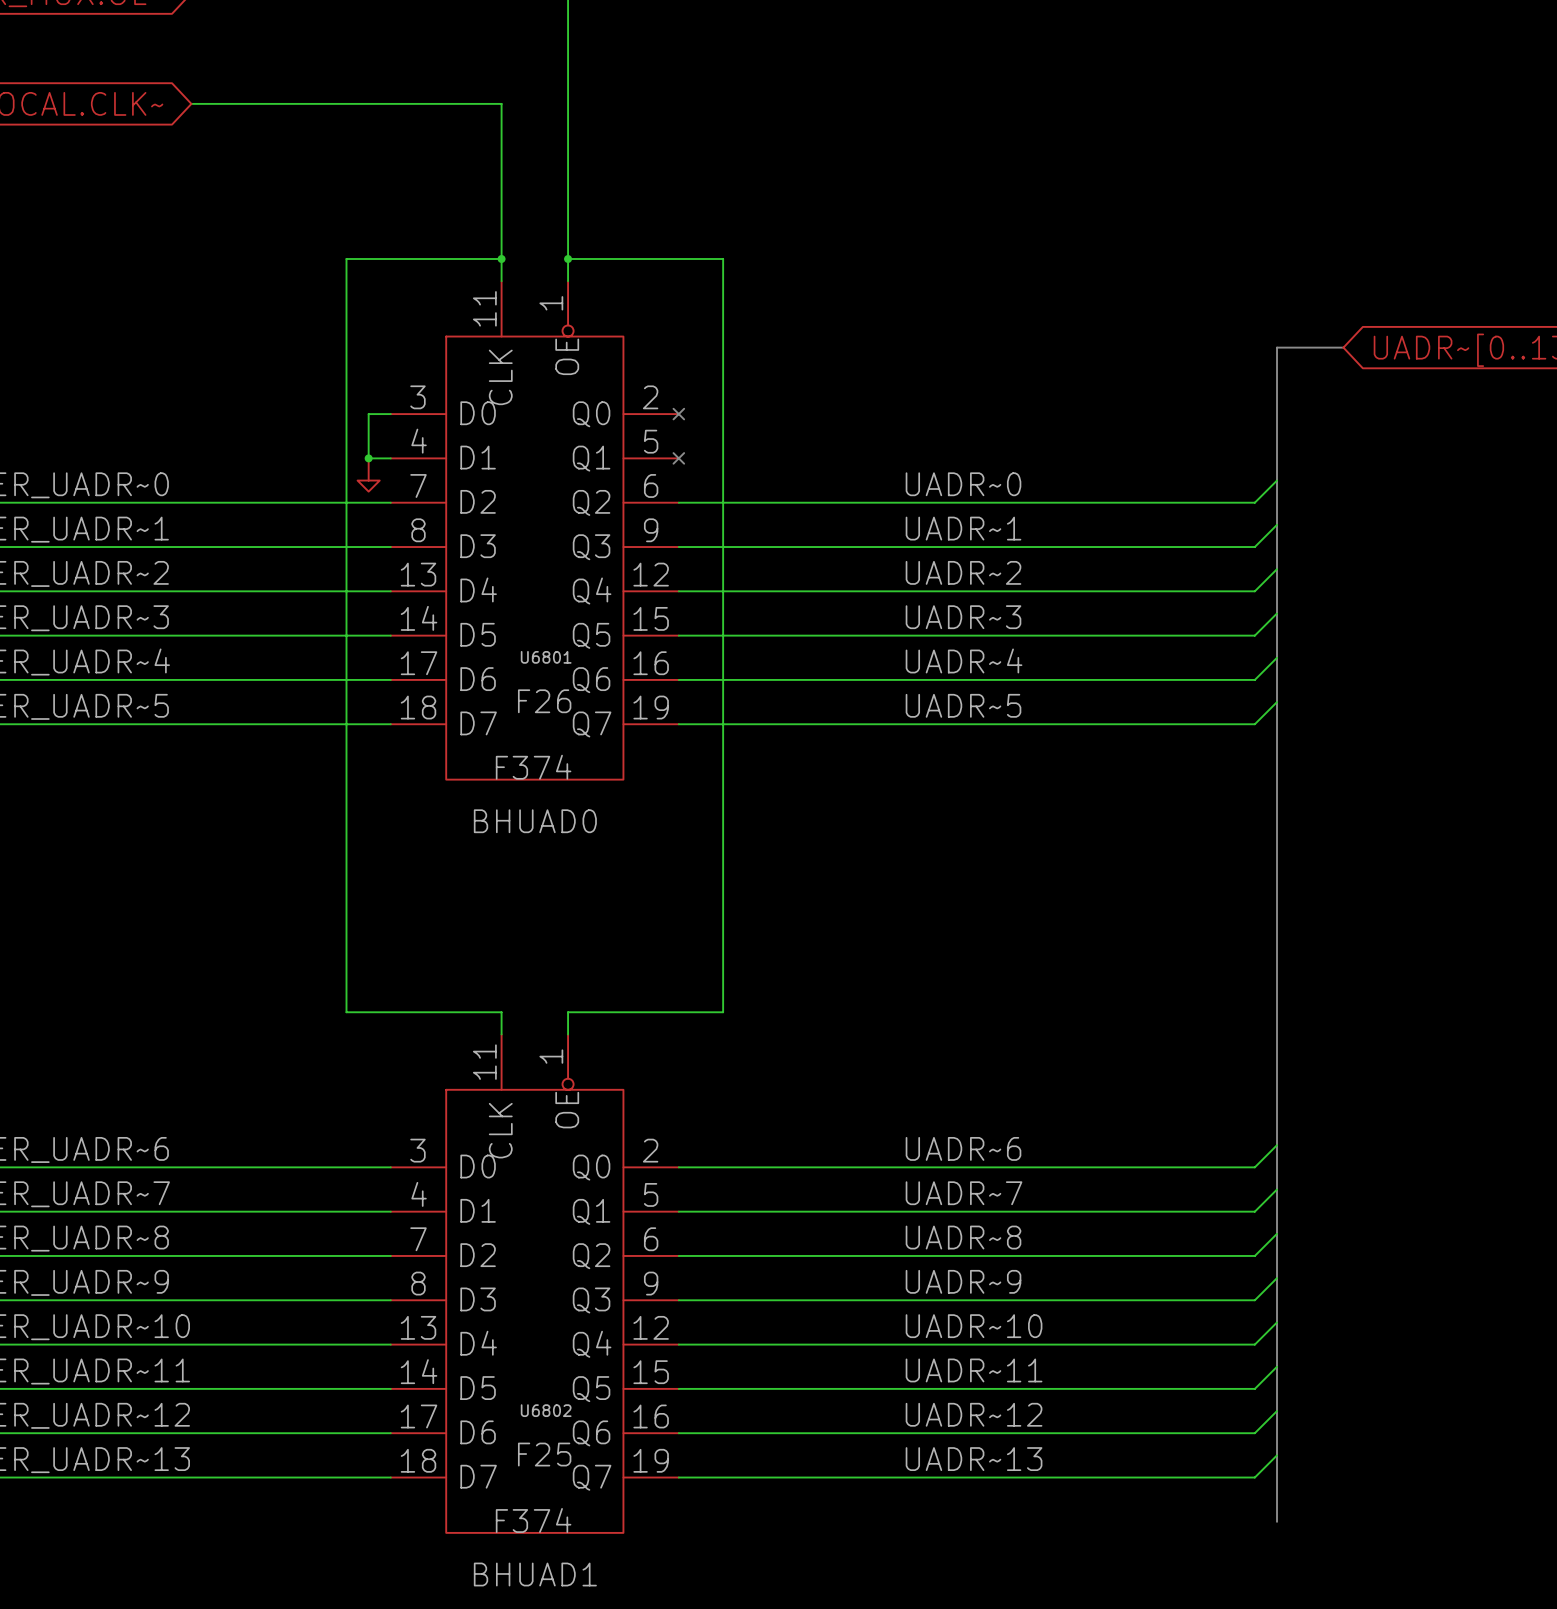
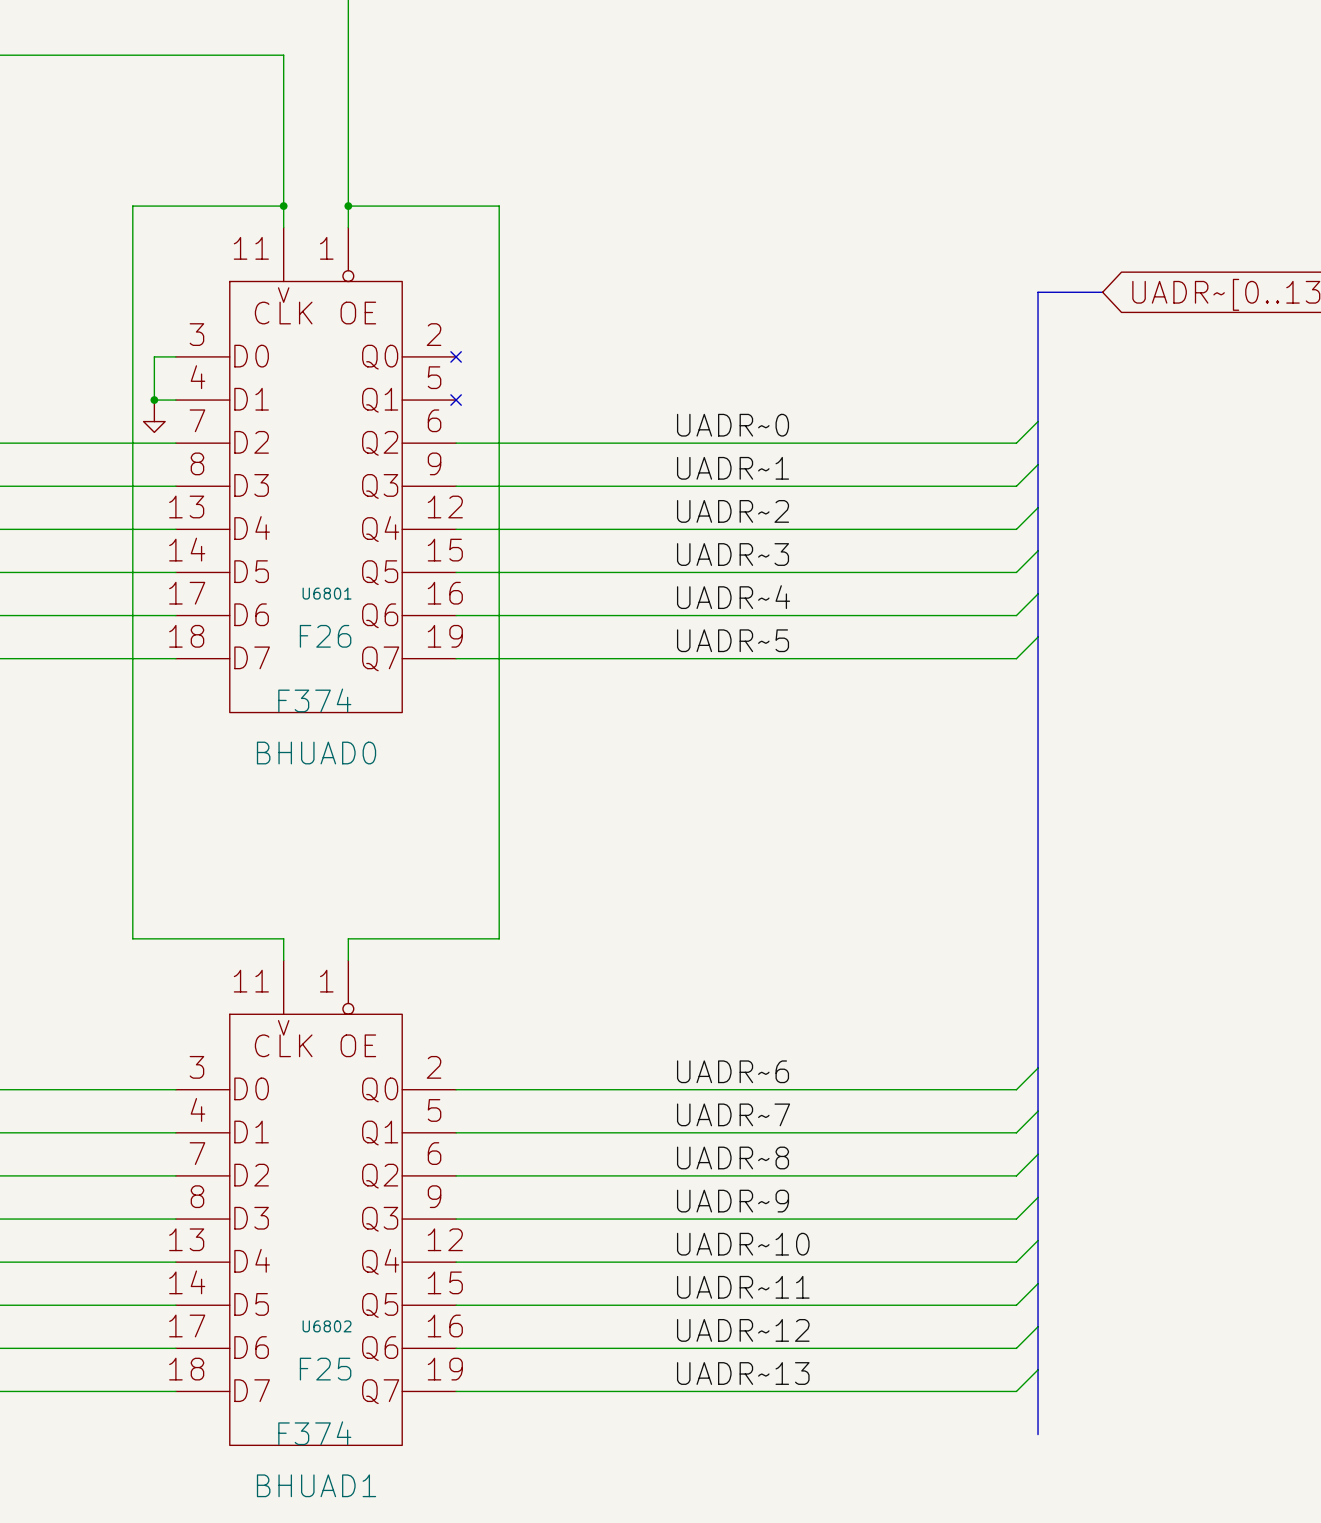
U6801 symbol: [390, 281, 679, 780] -> [175, 227, 457, 713]
U6802 symbol: [390, 1034, 679, 1533] -> [175, 960, 457, 1446]

